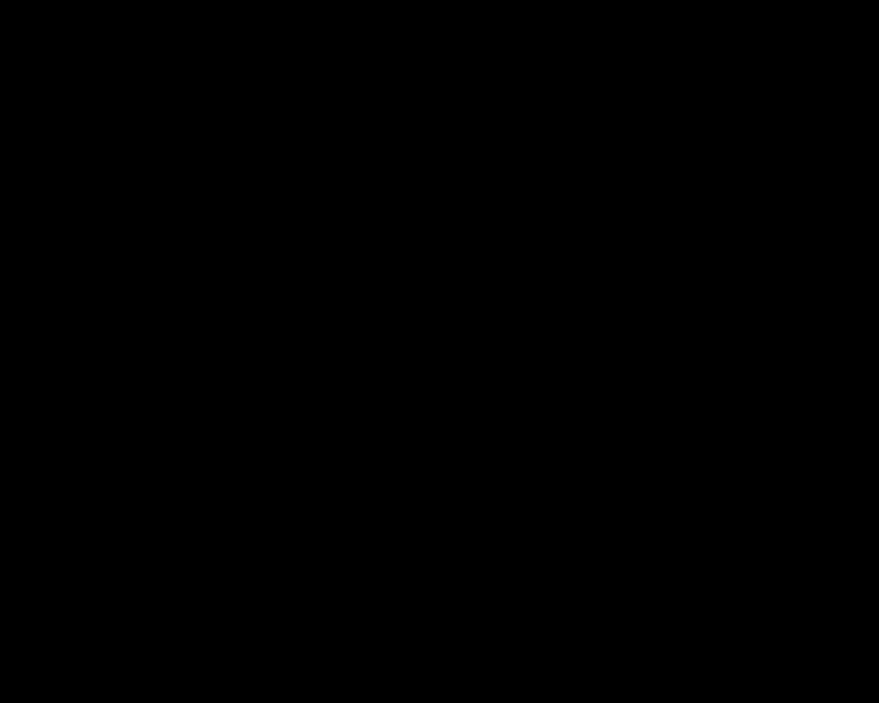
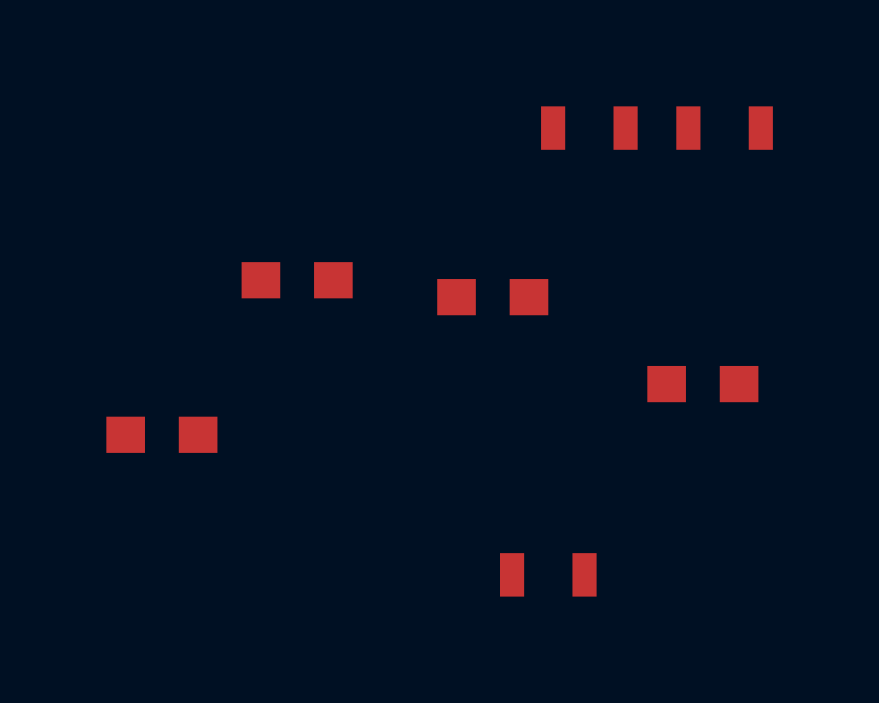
part: none -> (589, 128)
part: none -> (724, 128)
part: none -> (297, 280)
part: none -> (492, 297)
part: none -> (702, 384)
part: none -> (161, 434)
part: none -> (548, 574)

